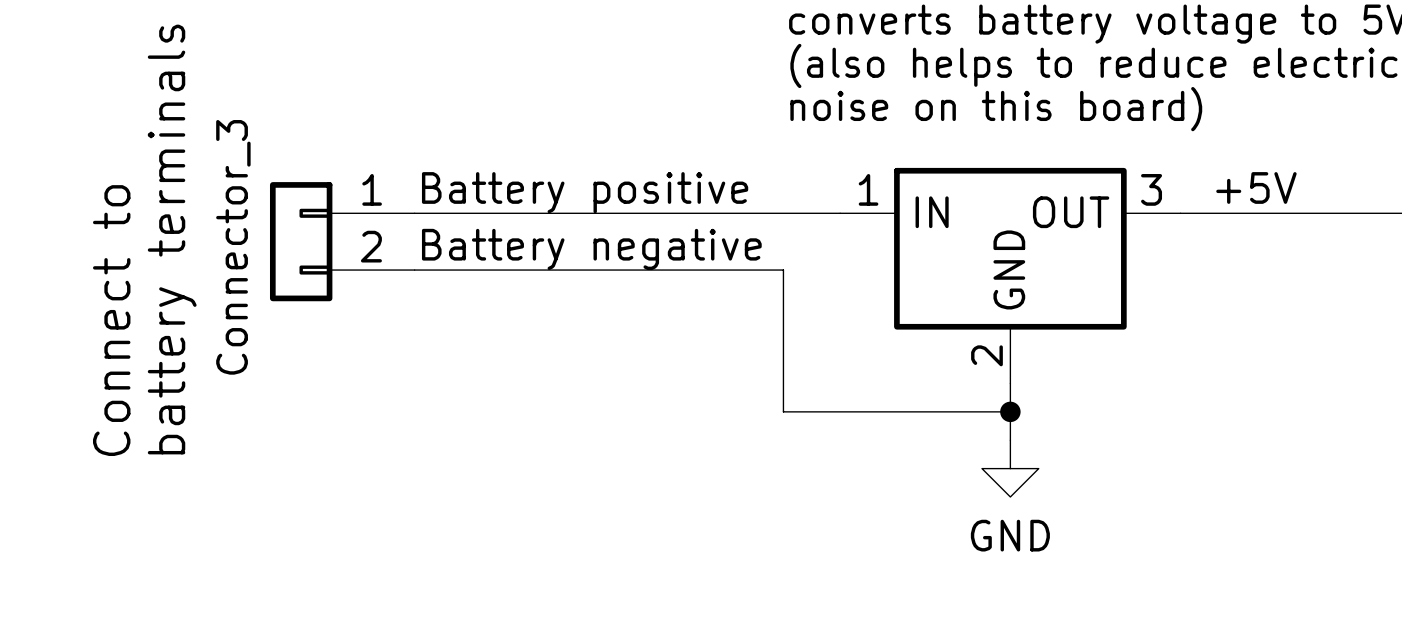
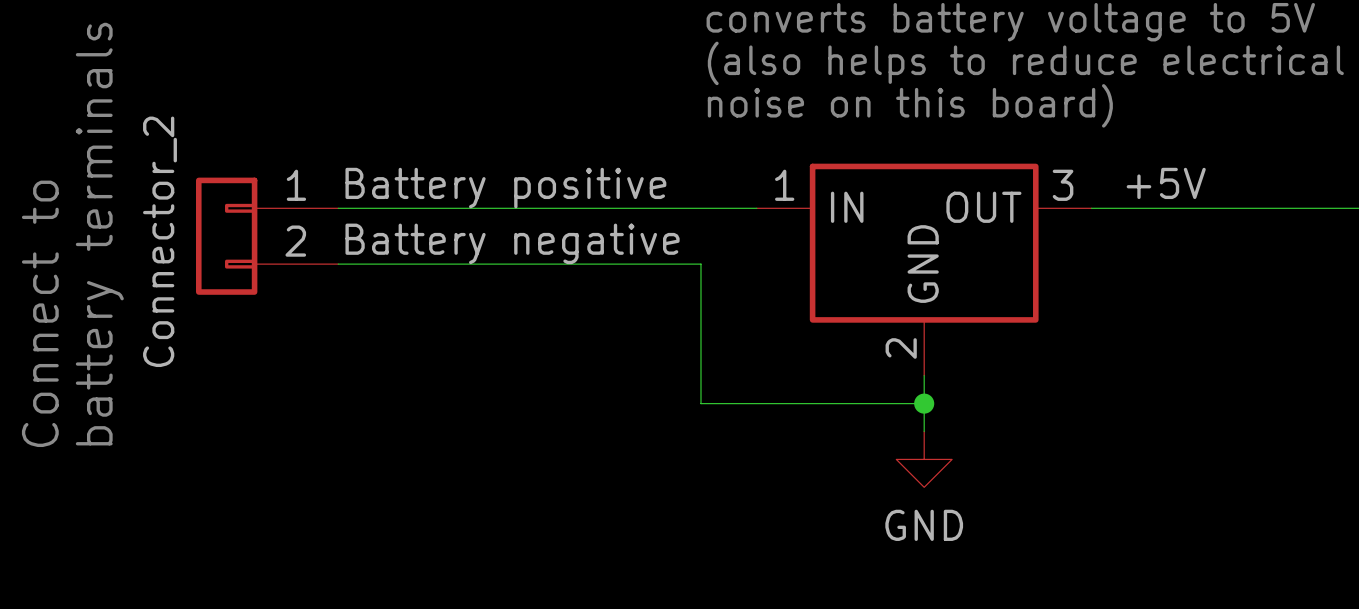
Connector_3 name: Connector_3 (233, 247) -> Connector_2 (160, 241)

